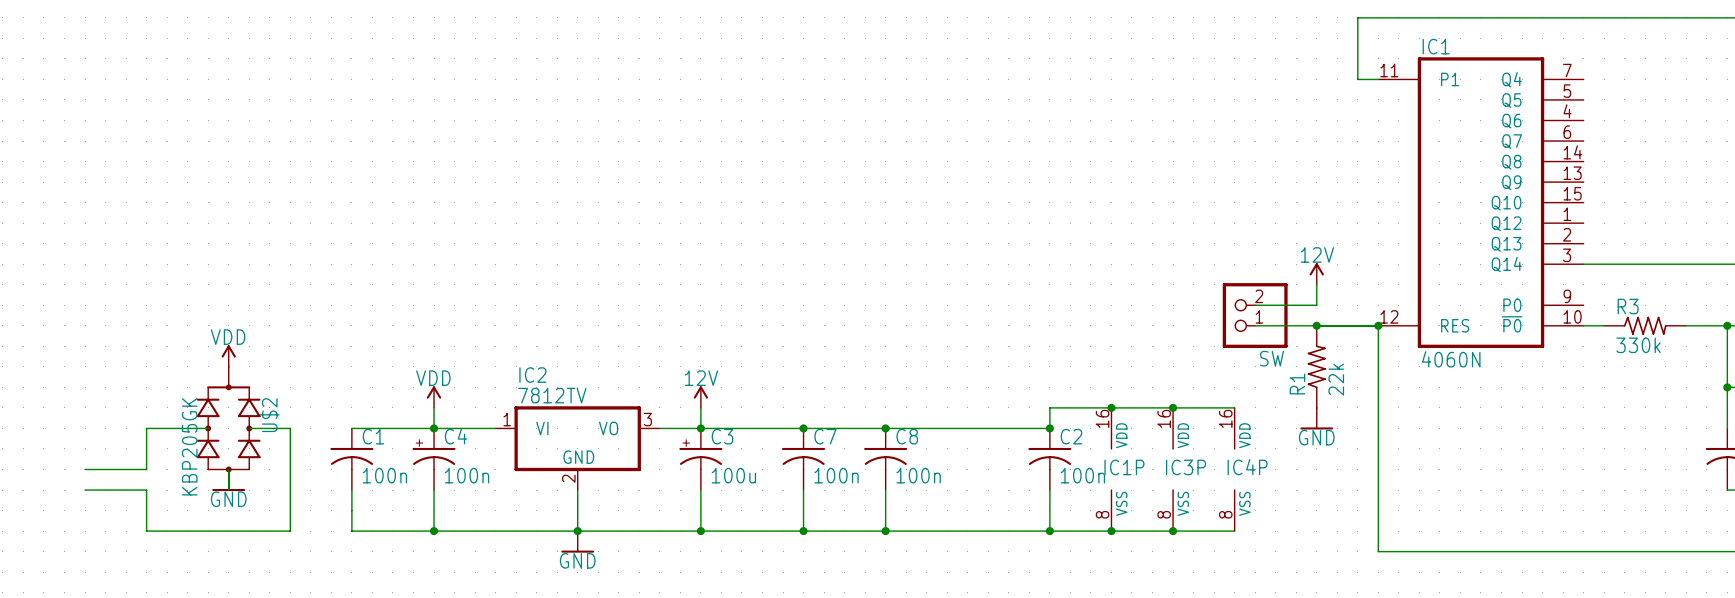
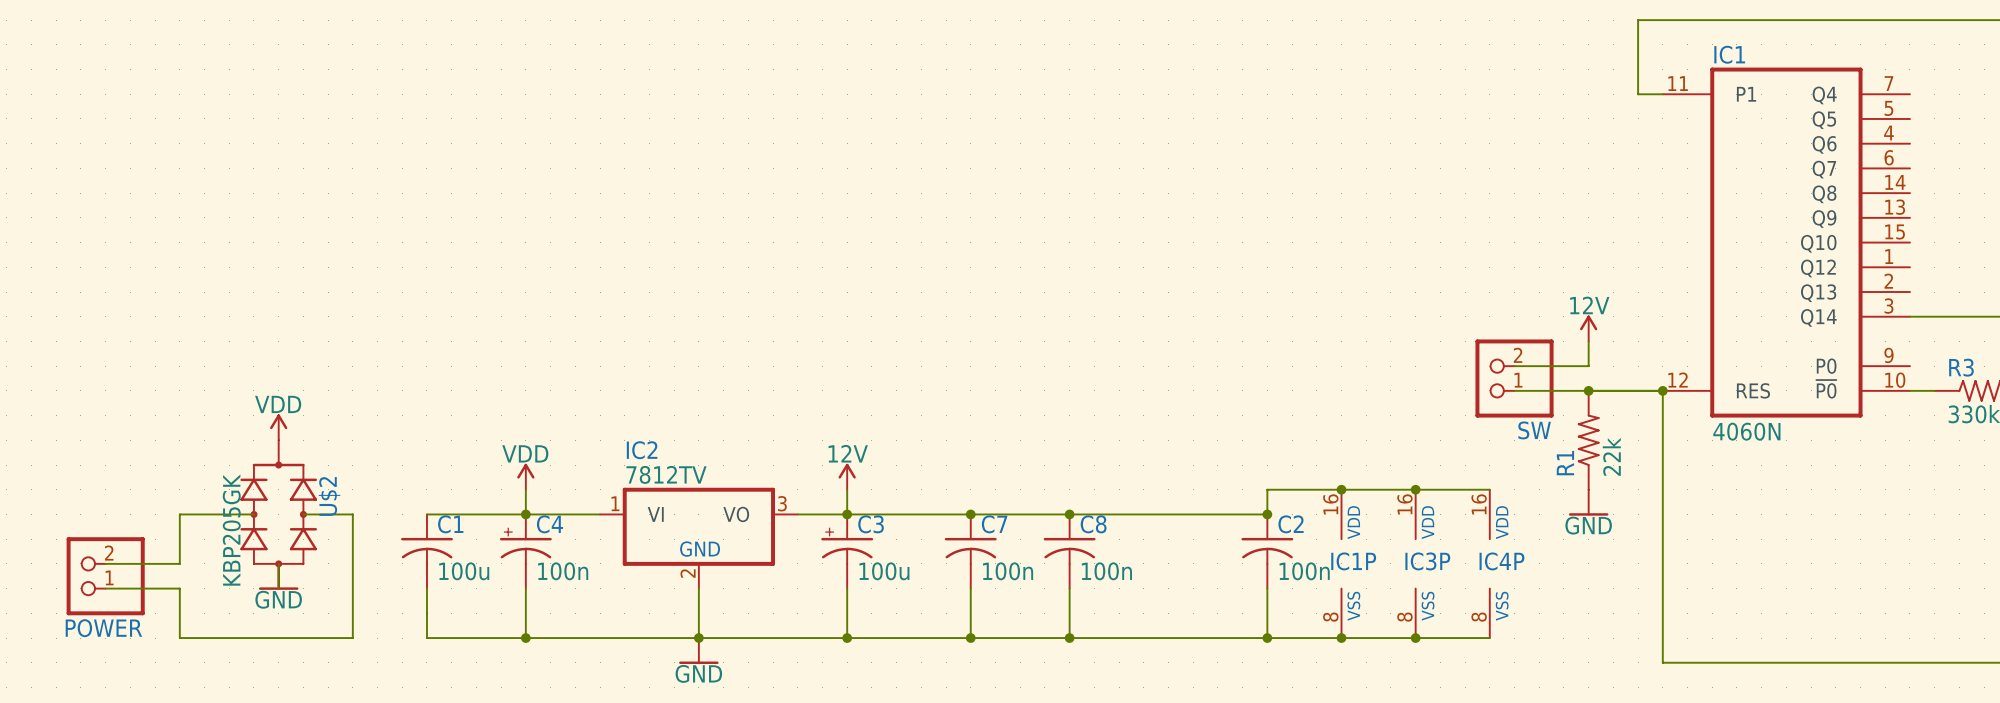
C1 value: 100n (384, 475) -> 100u (464, 571)
POWER: none -> (105, 576)

